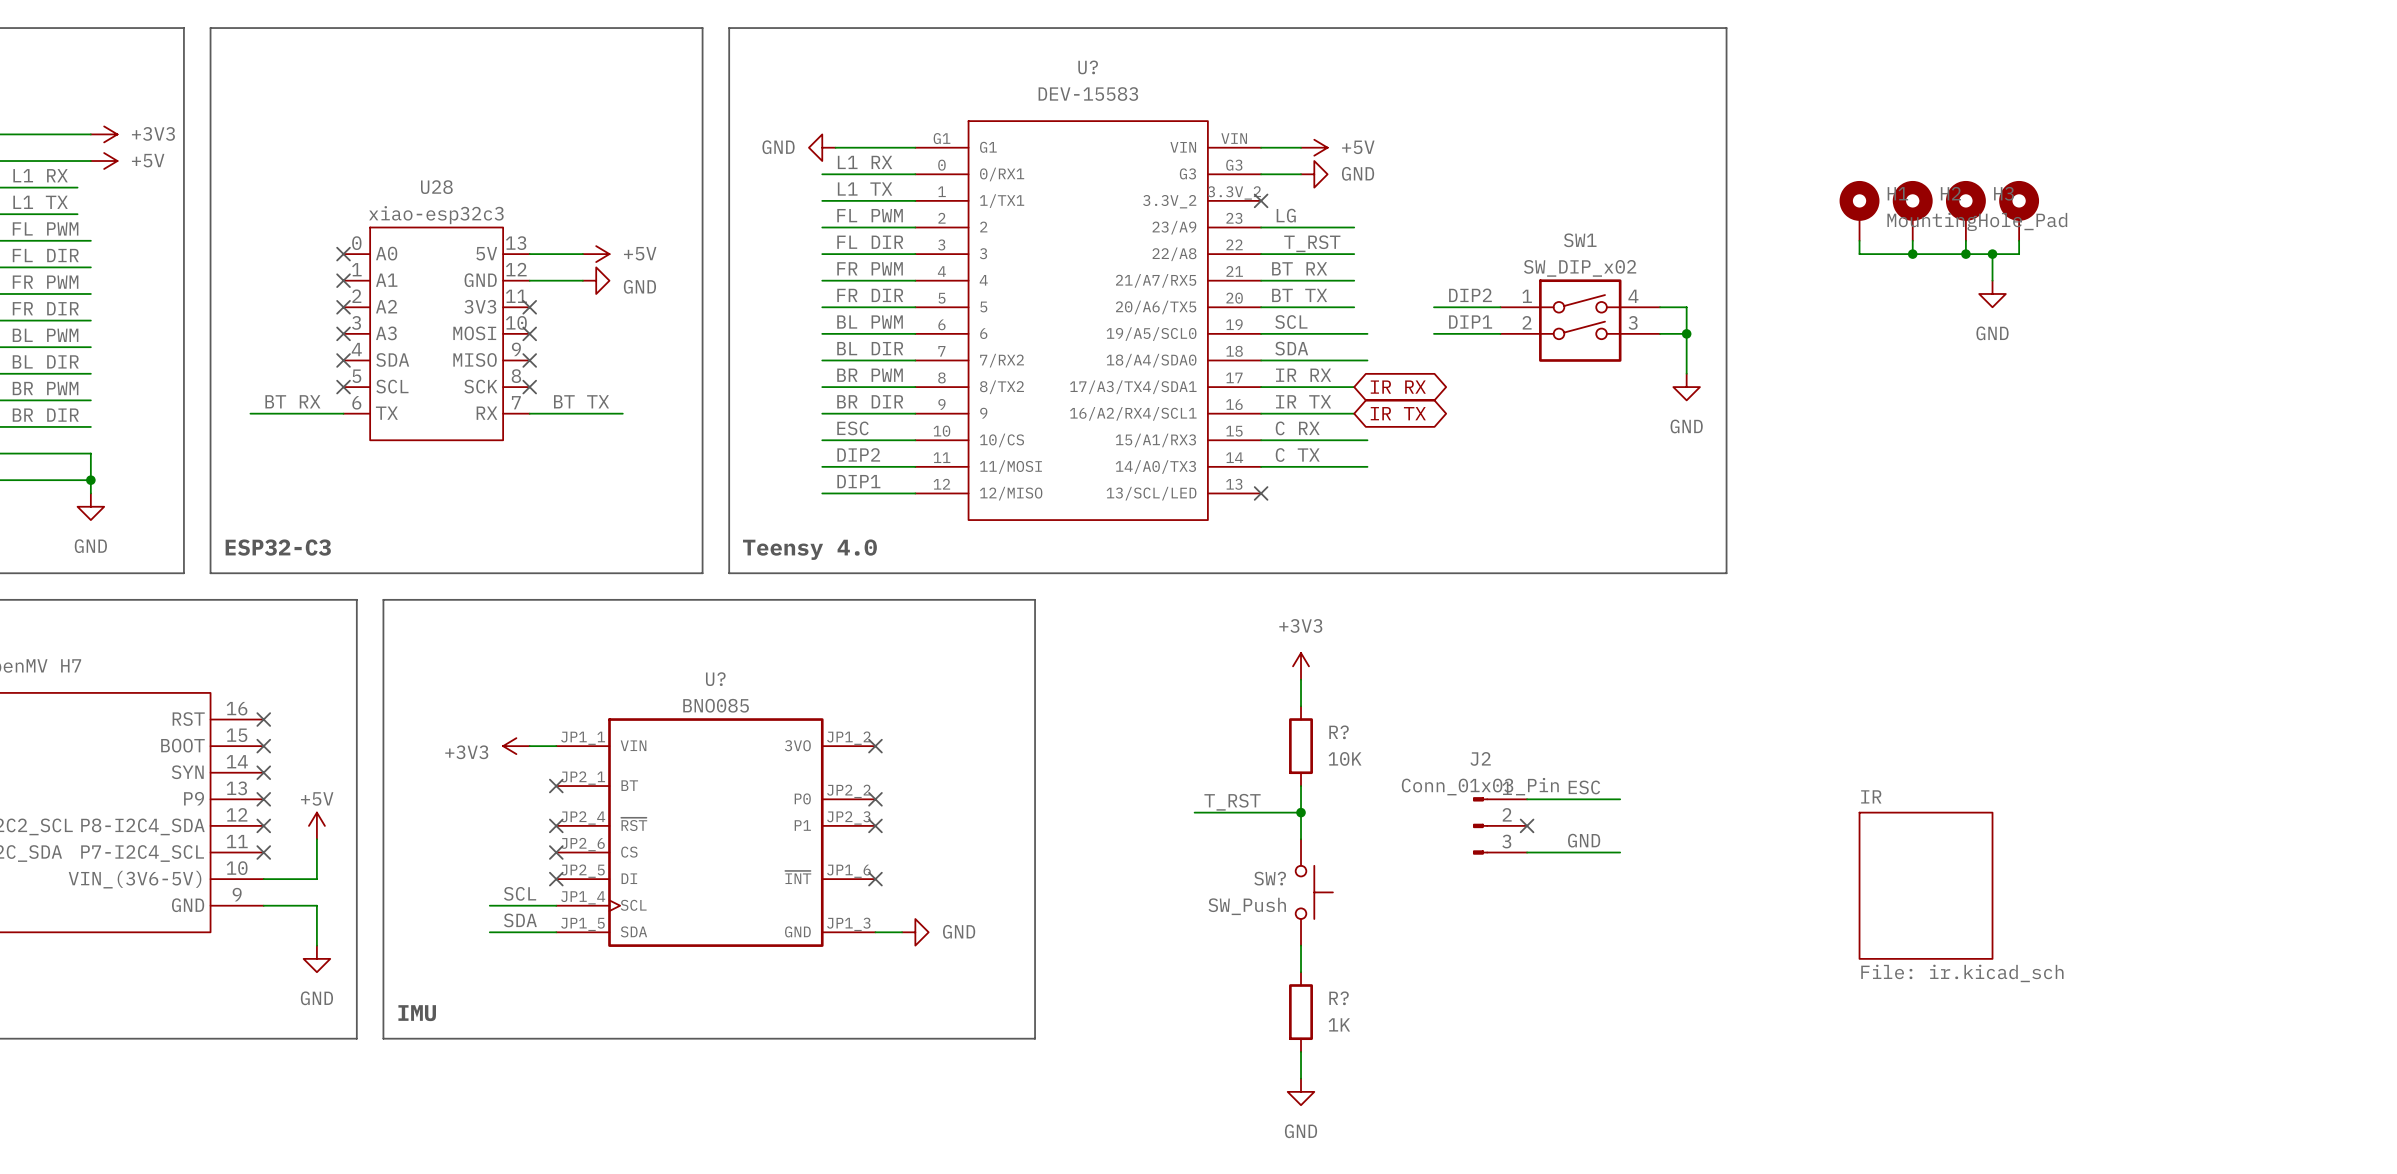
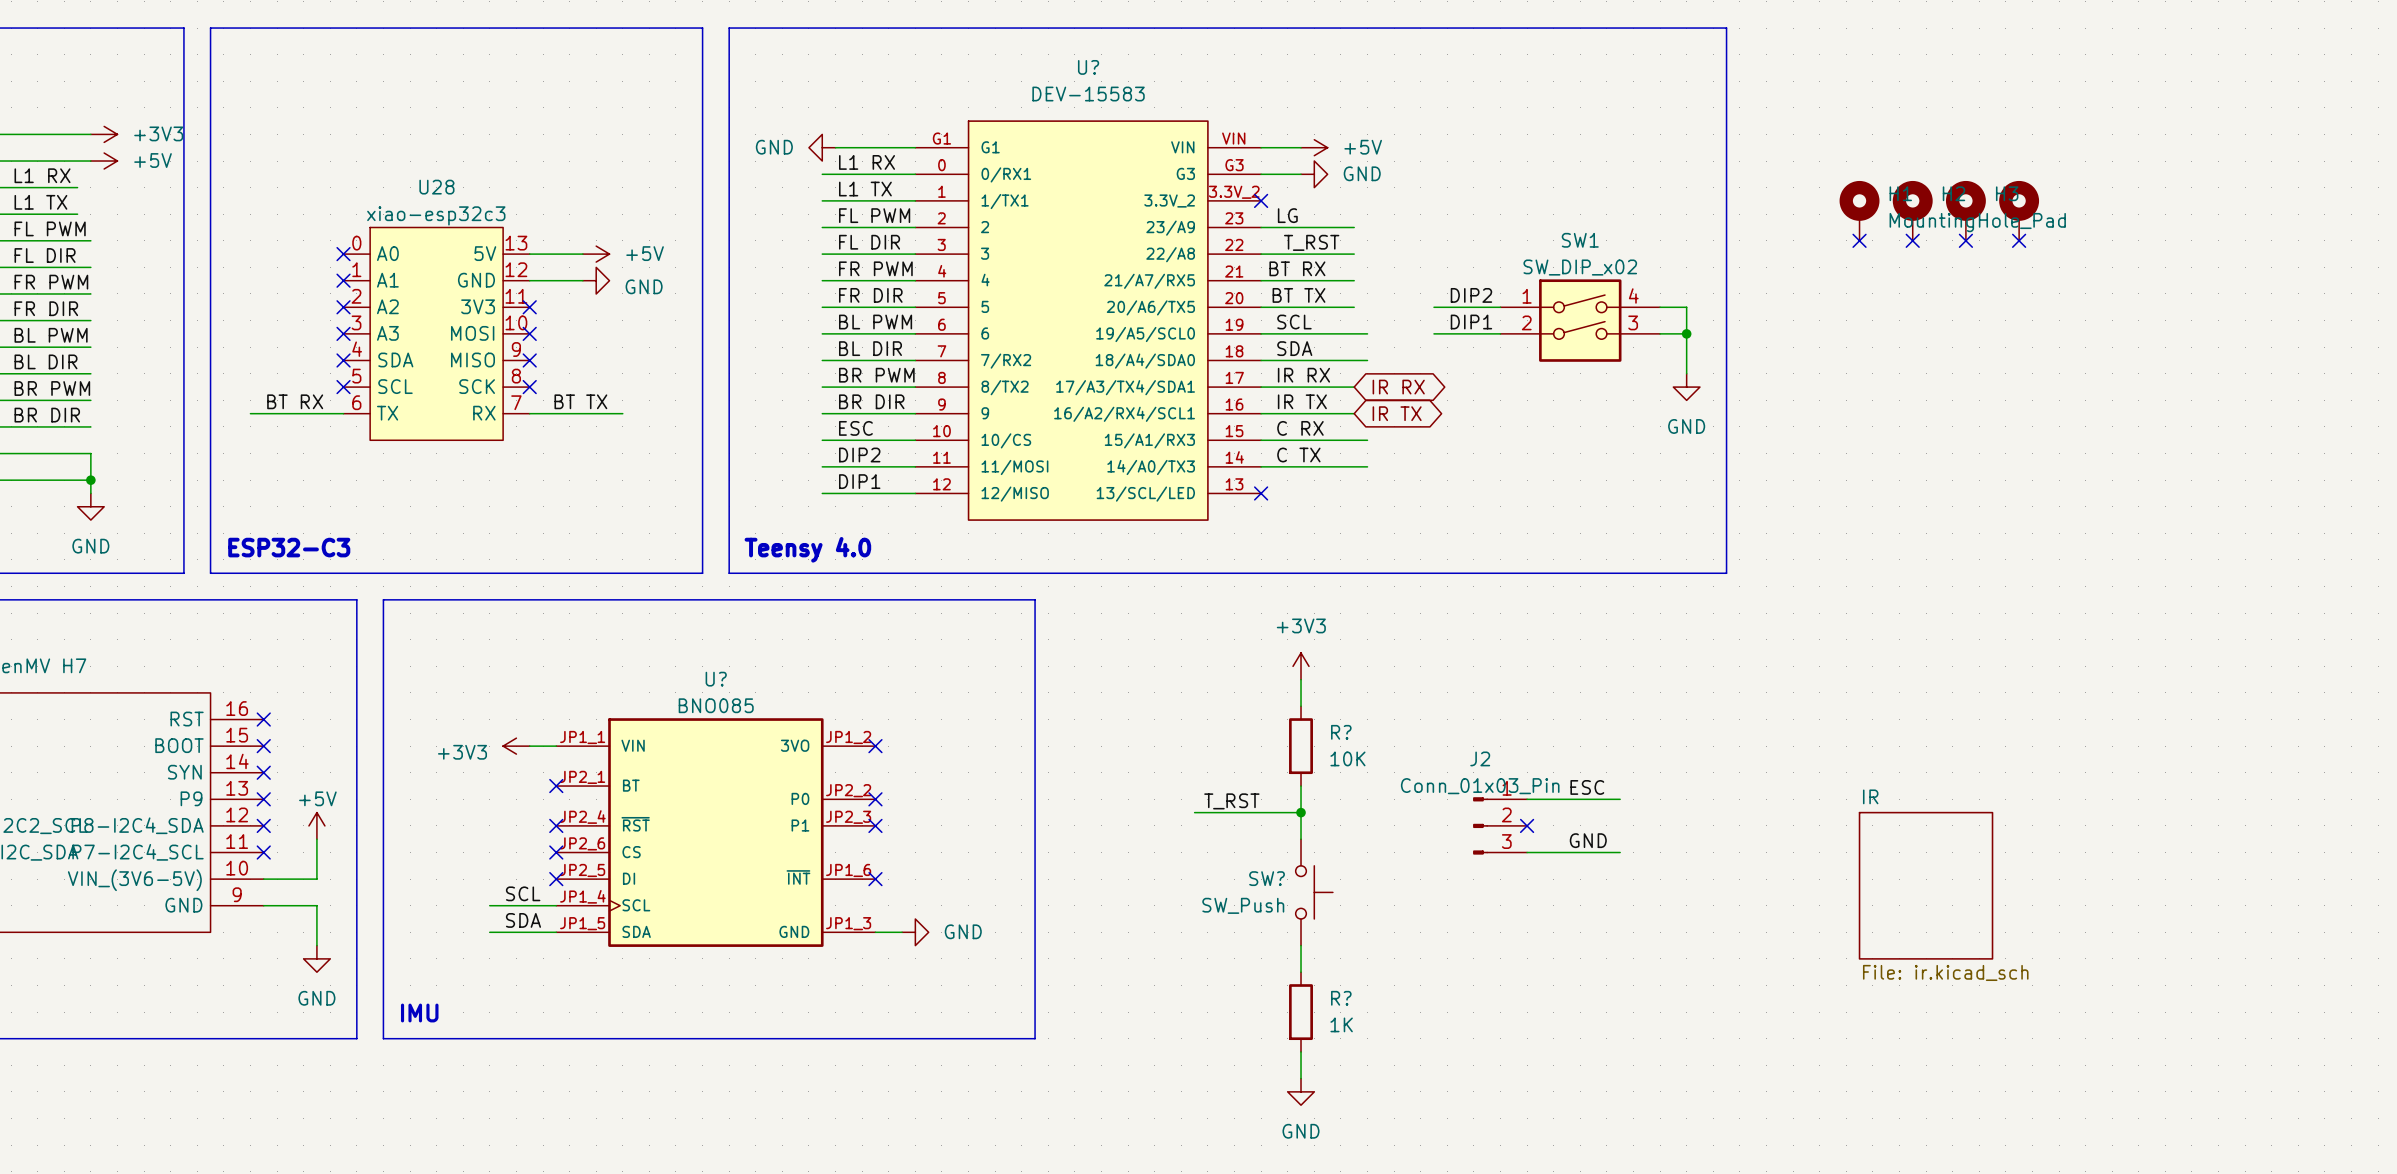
wire: (1859, 240) (1859, 254) (2019, 254) (2019, 240) -> none
no-connect mark: none -> (1859, 240)
wire: (1912, 240) (1912, 254) -> none
no-connect mark: none -> (1912, 240)
wire: (1965, 240) (1965, 254) -> none
no-connect mark: none -> (1965, 240)
no-connect mark: none -> (2019, 240)
junction: (1912, 254) -> none
junction: (1965, 254) -> none
wire: (1992, 254) (1992, 280) -> none
junction: (1992, 254) -> none
power symbol: GND (1992, 293) -> none

